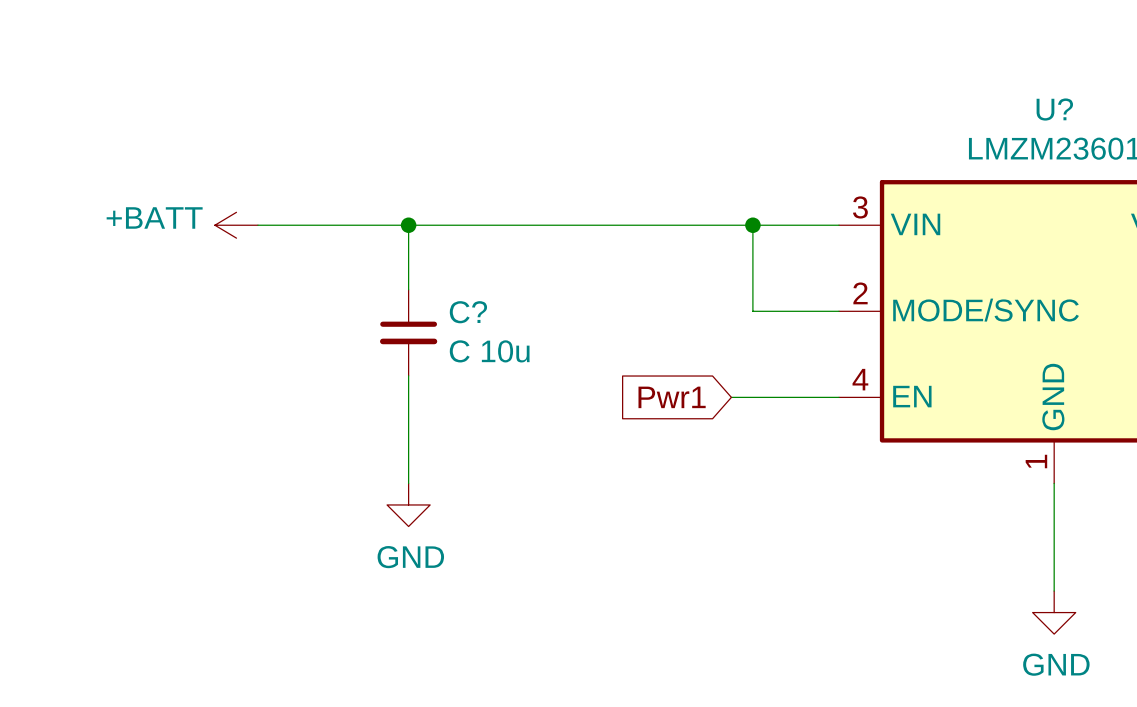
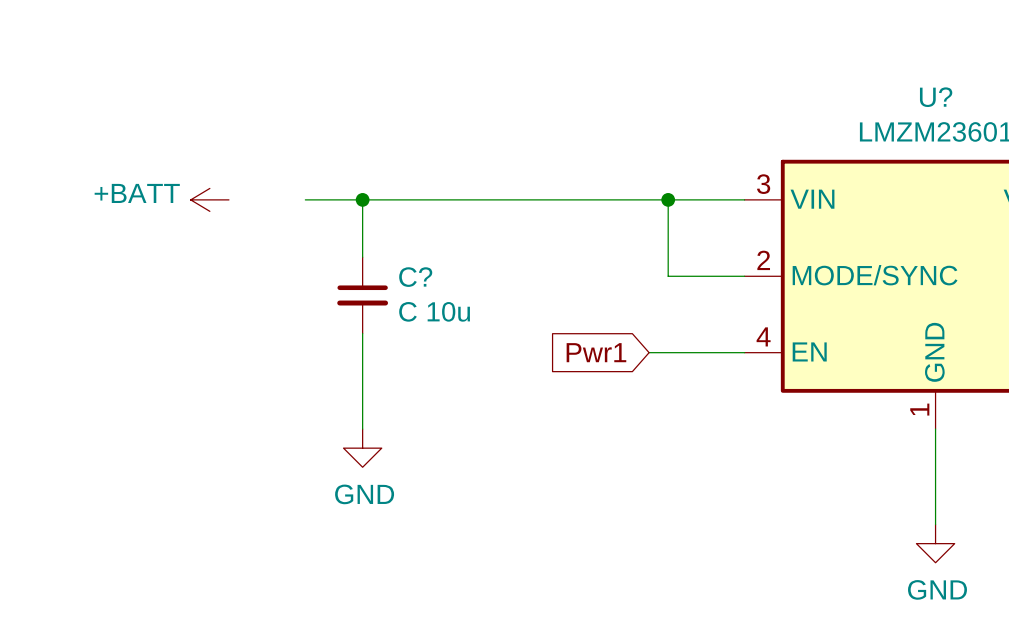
wire: (257, 225) (344, 225) -> none

